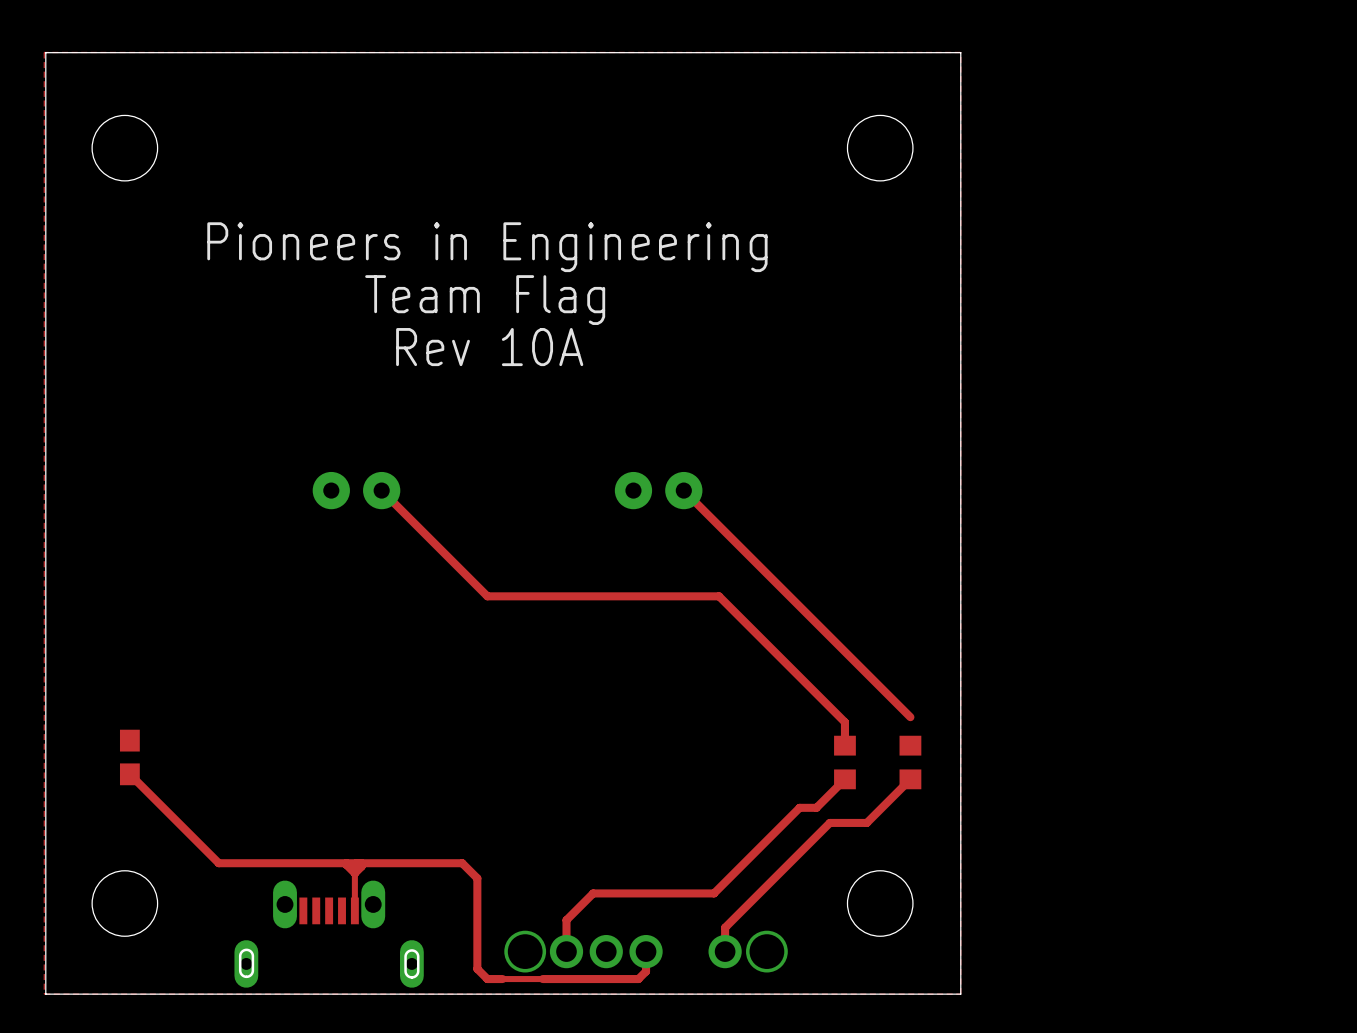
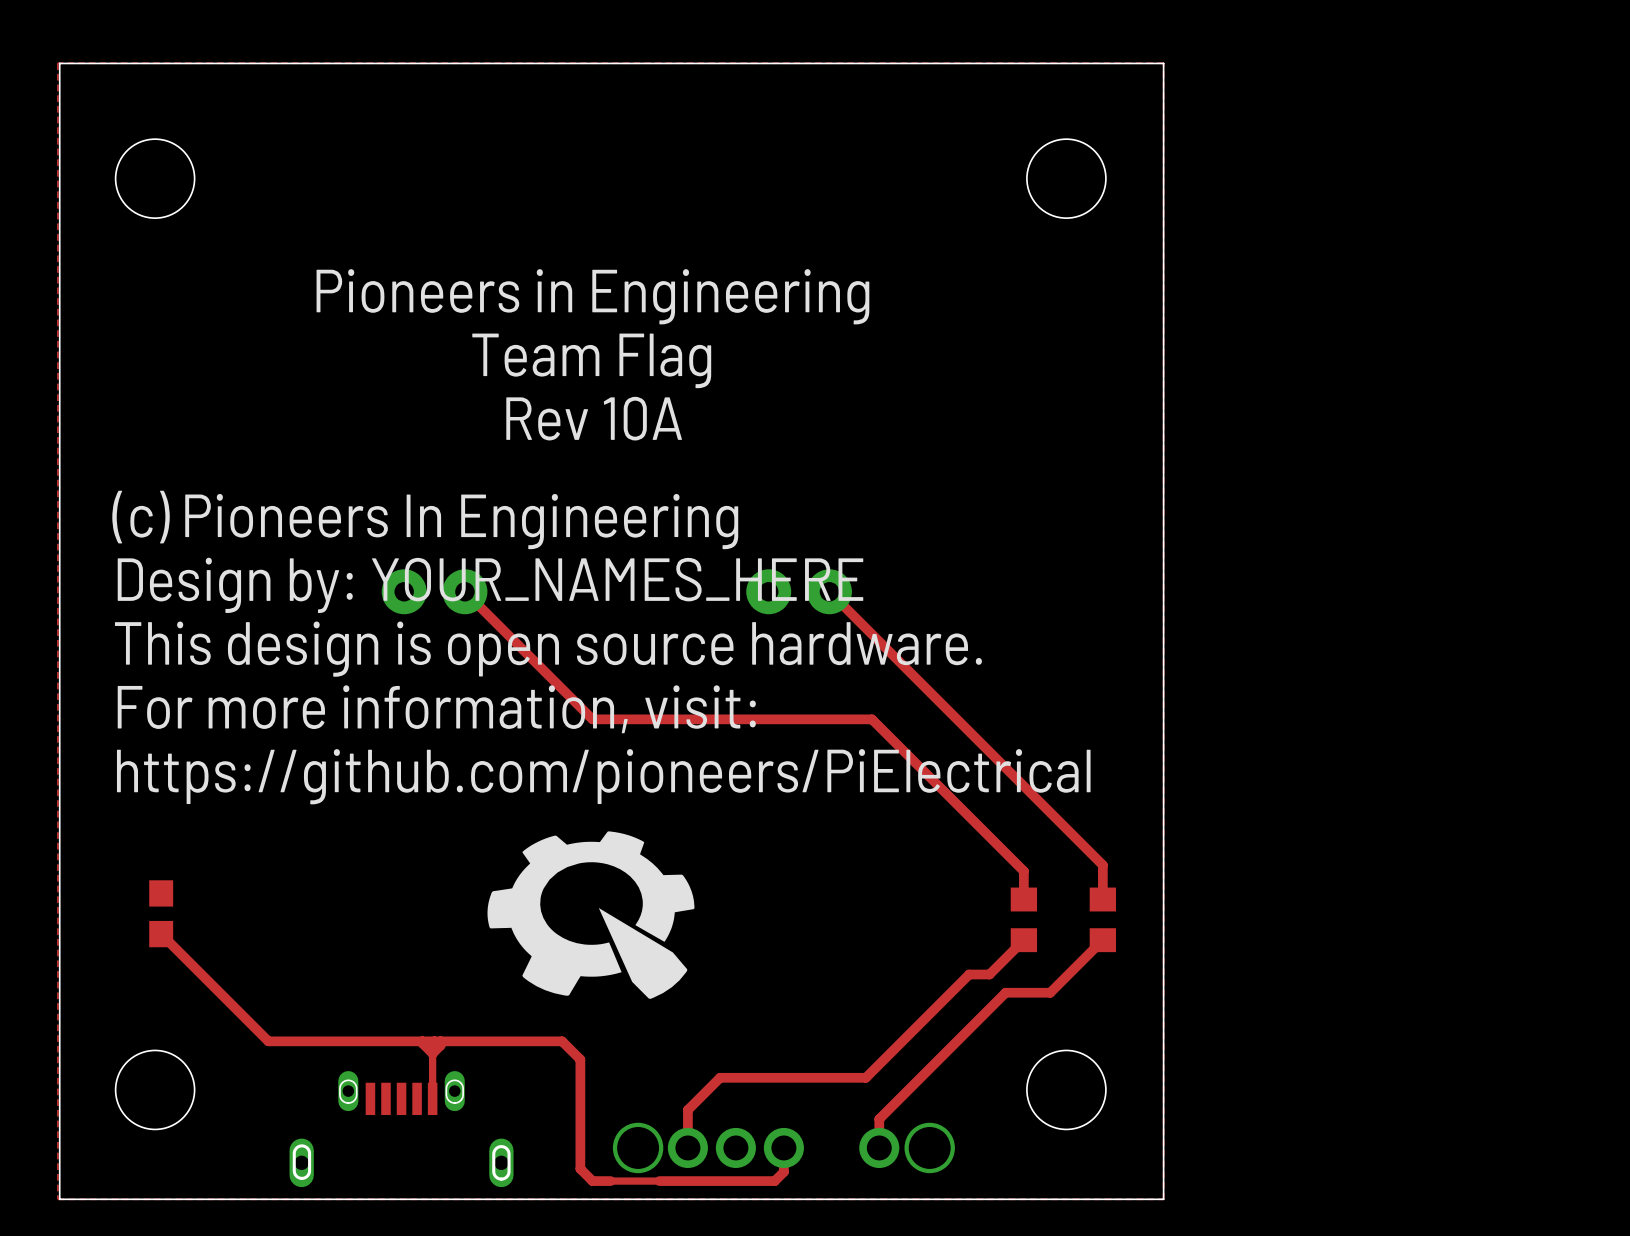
text: none -> (c) Pioneers In Engineering (425, 519)
text: none -> Design by: YOUR_NAMES_HERE (490, 585)
text: none -> This design is open source hardware. (548, 649)
text: none -> For more information, visit: (436, 709)
text: none -> https://github.com/pioneers/PiElectrical (603, 776)
drawing: none -> [487, 831, 695, 999]
top track: none -> (1102, 865) (1102, 899)
part footprint: [234, 880, 424, 988] -> [289, 1071, 514, 1188]

